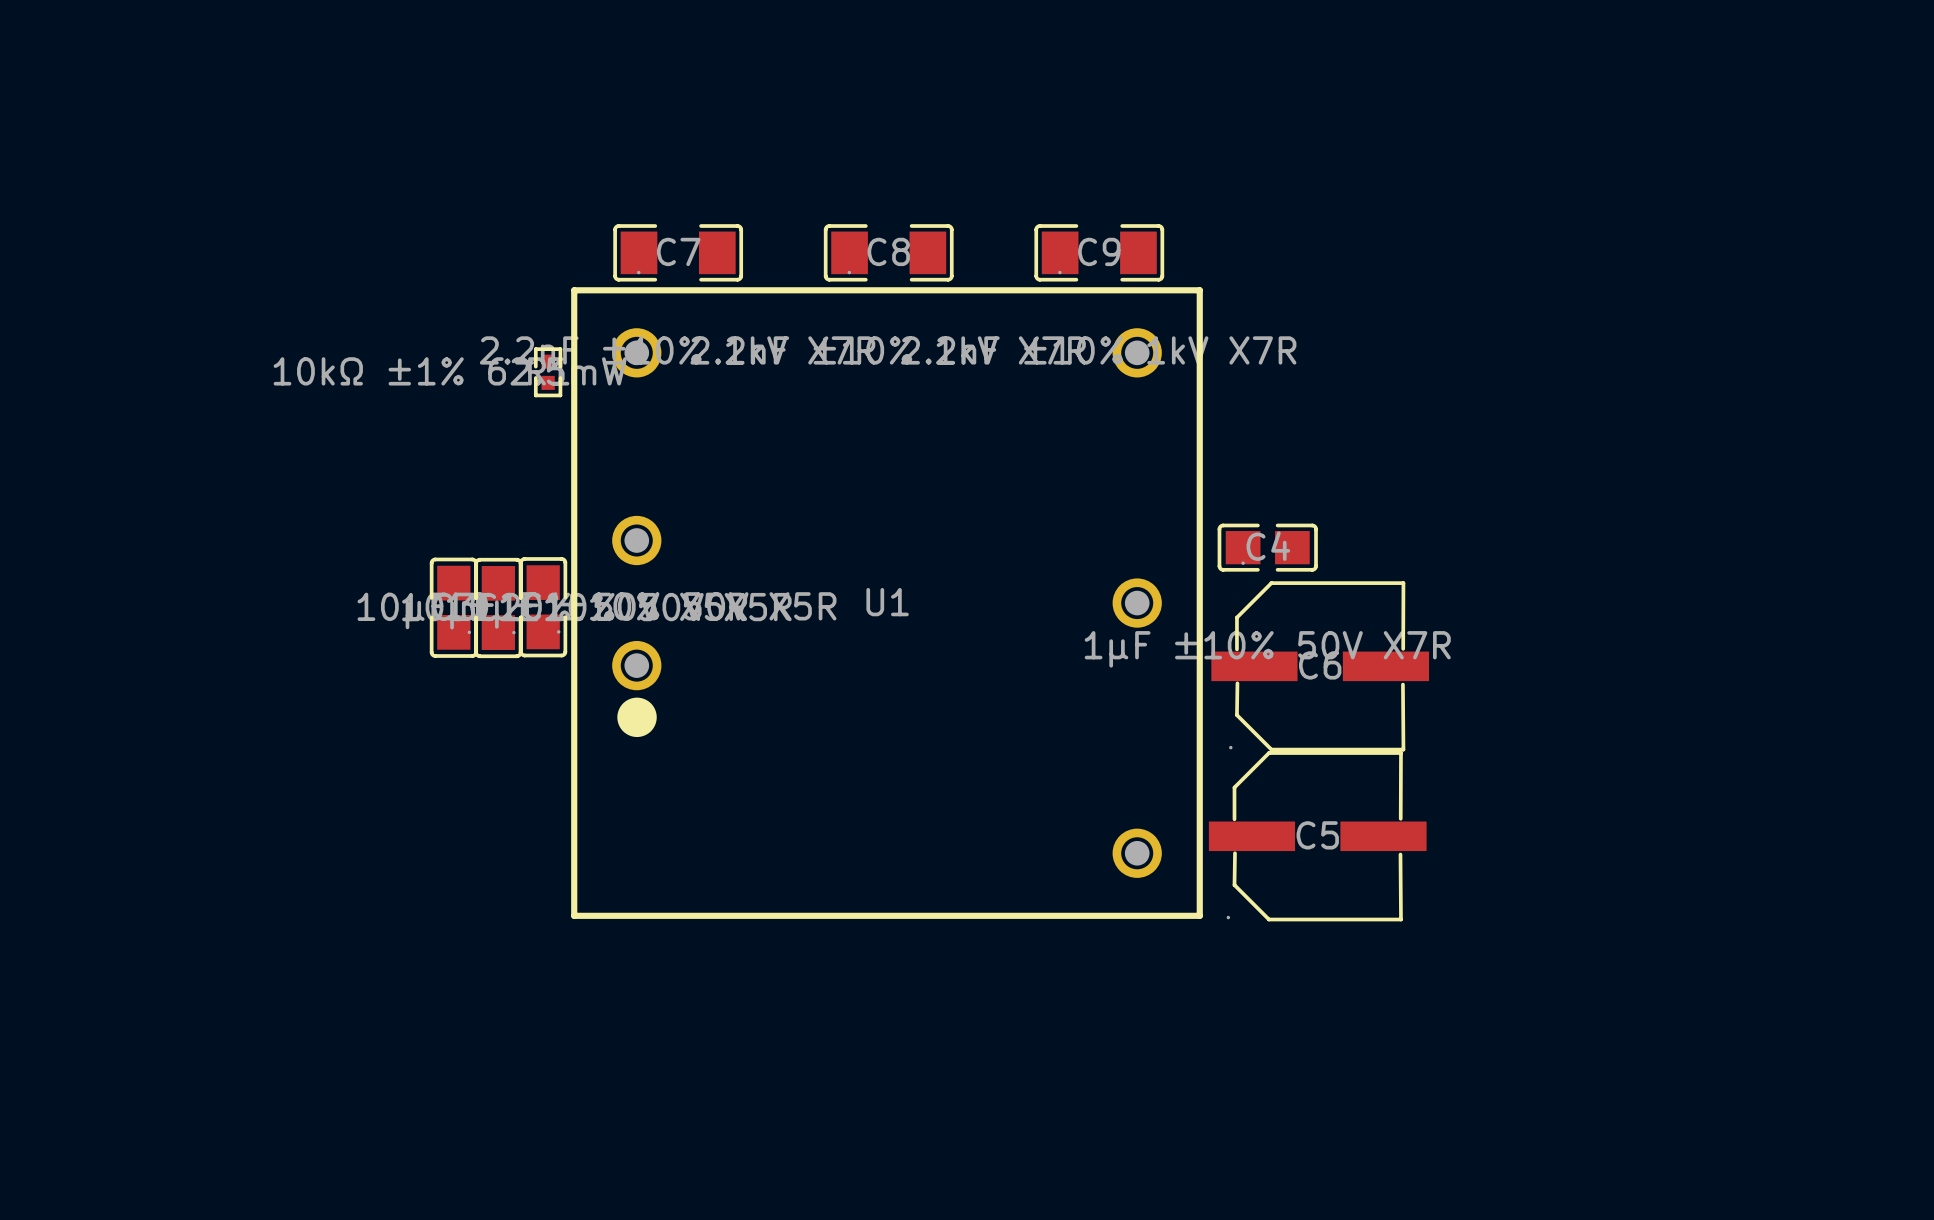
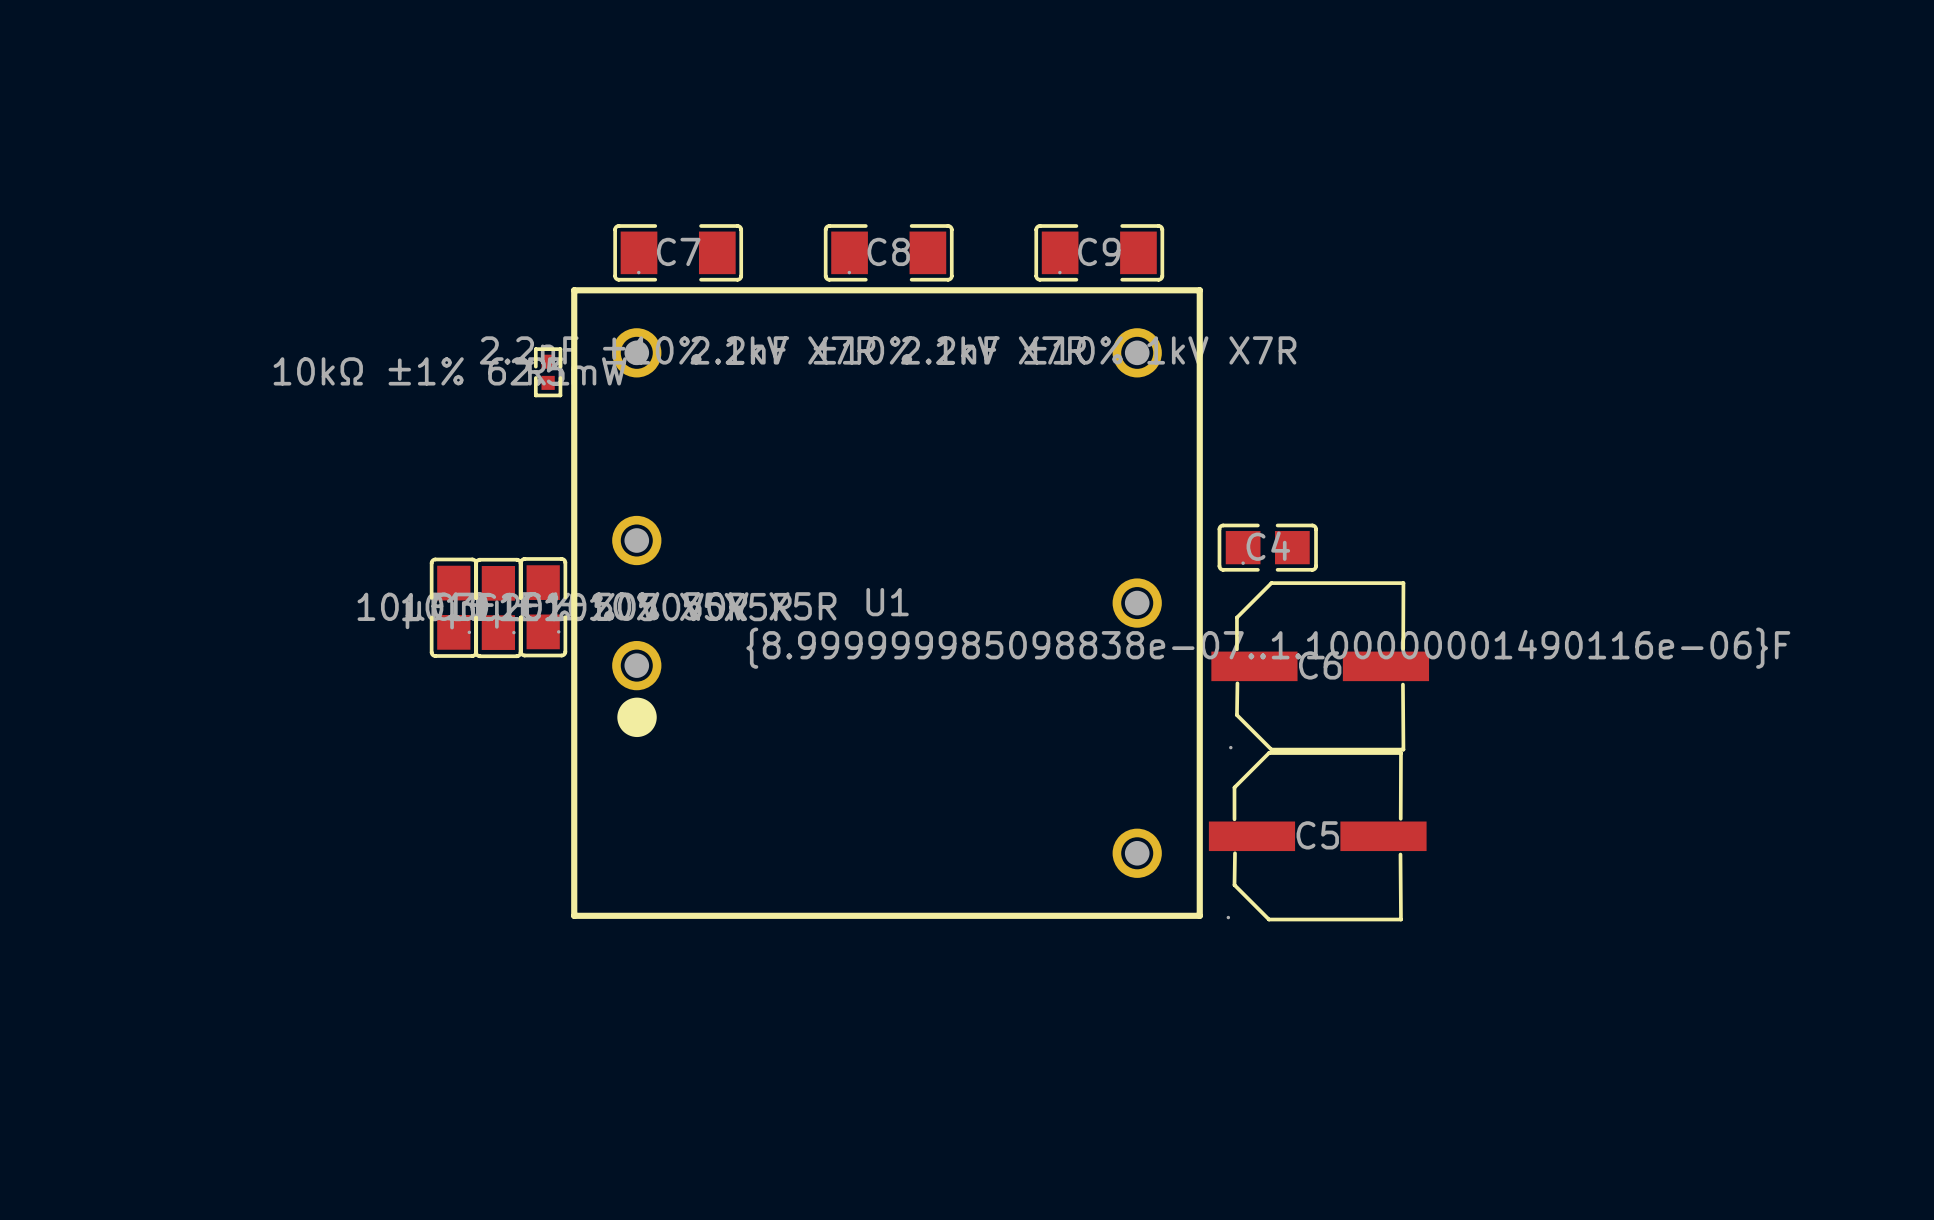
C4 value: 1µF ±10% 50V X7R (1267, 649) -> {8.999999985098838e-07..1.100000001490116e-06}F (1268, 648)

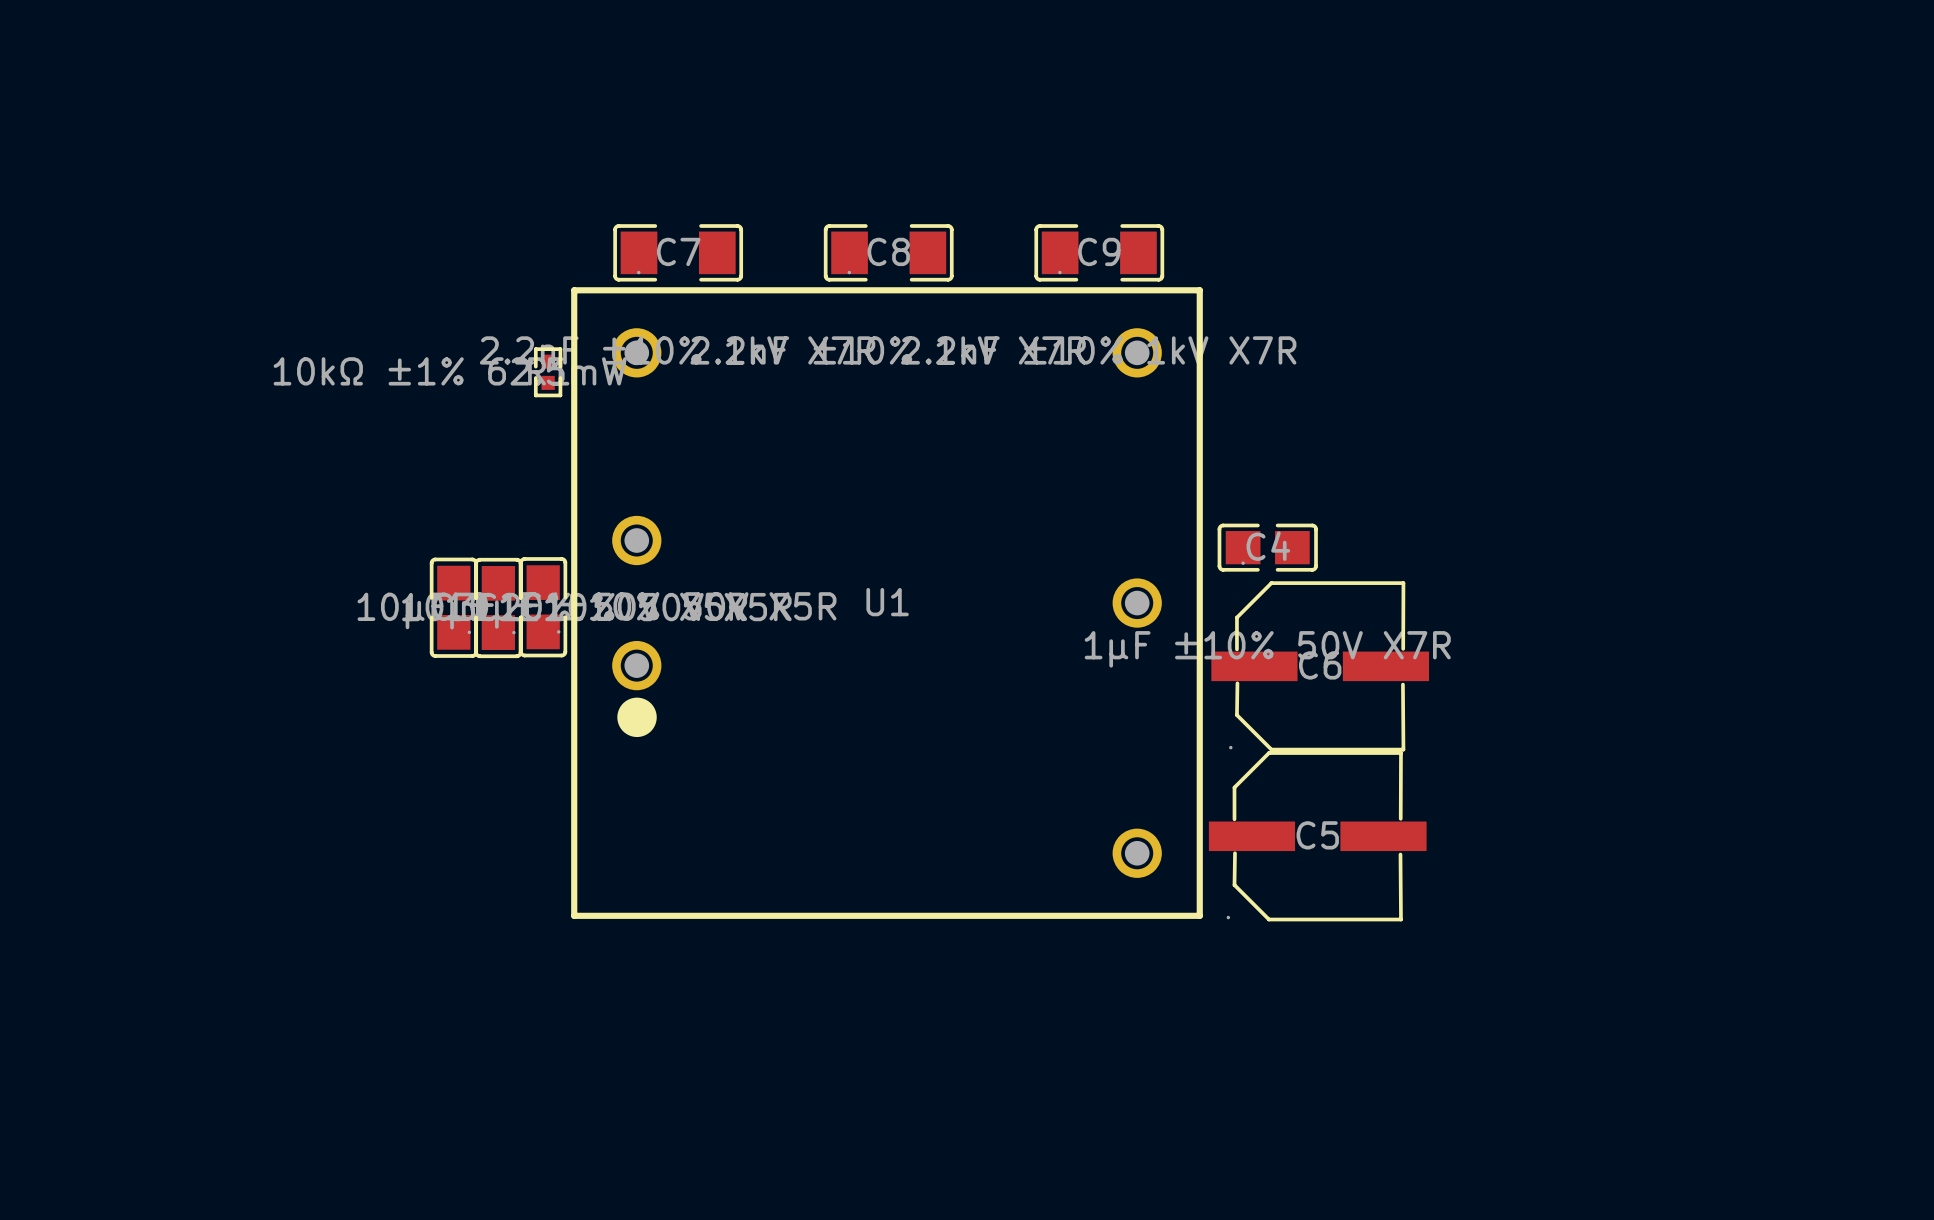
C4 value: {8.999999985098838e-07..1.100000001490116e-06}F (1268, 648) -> 1µF ±10% 50V X7R (1267, 649)

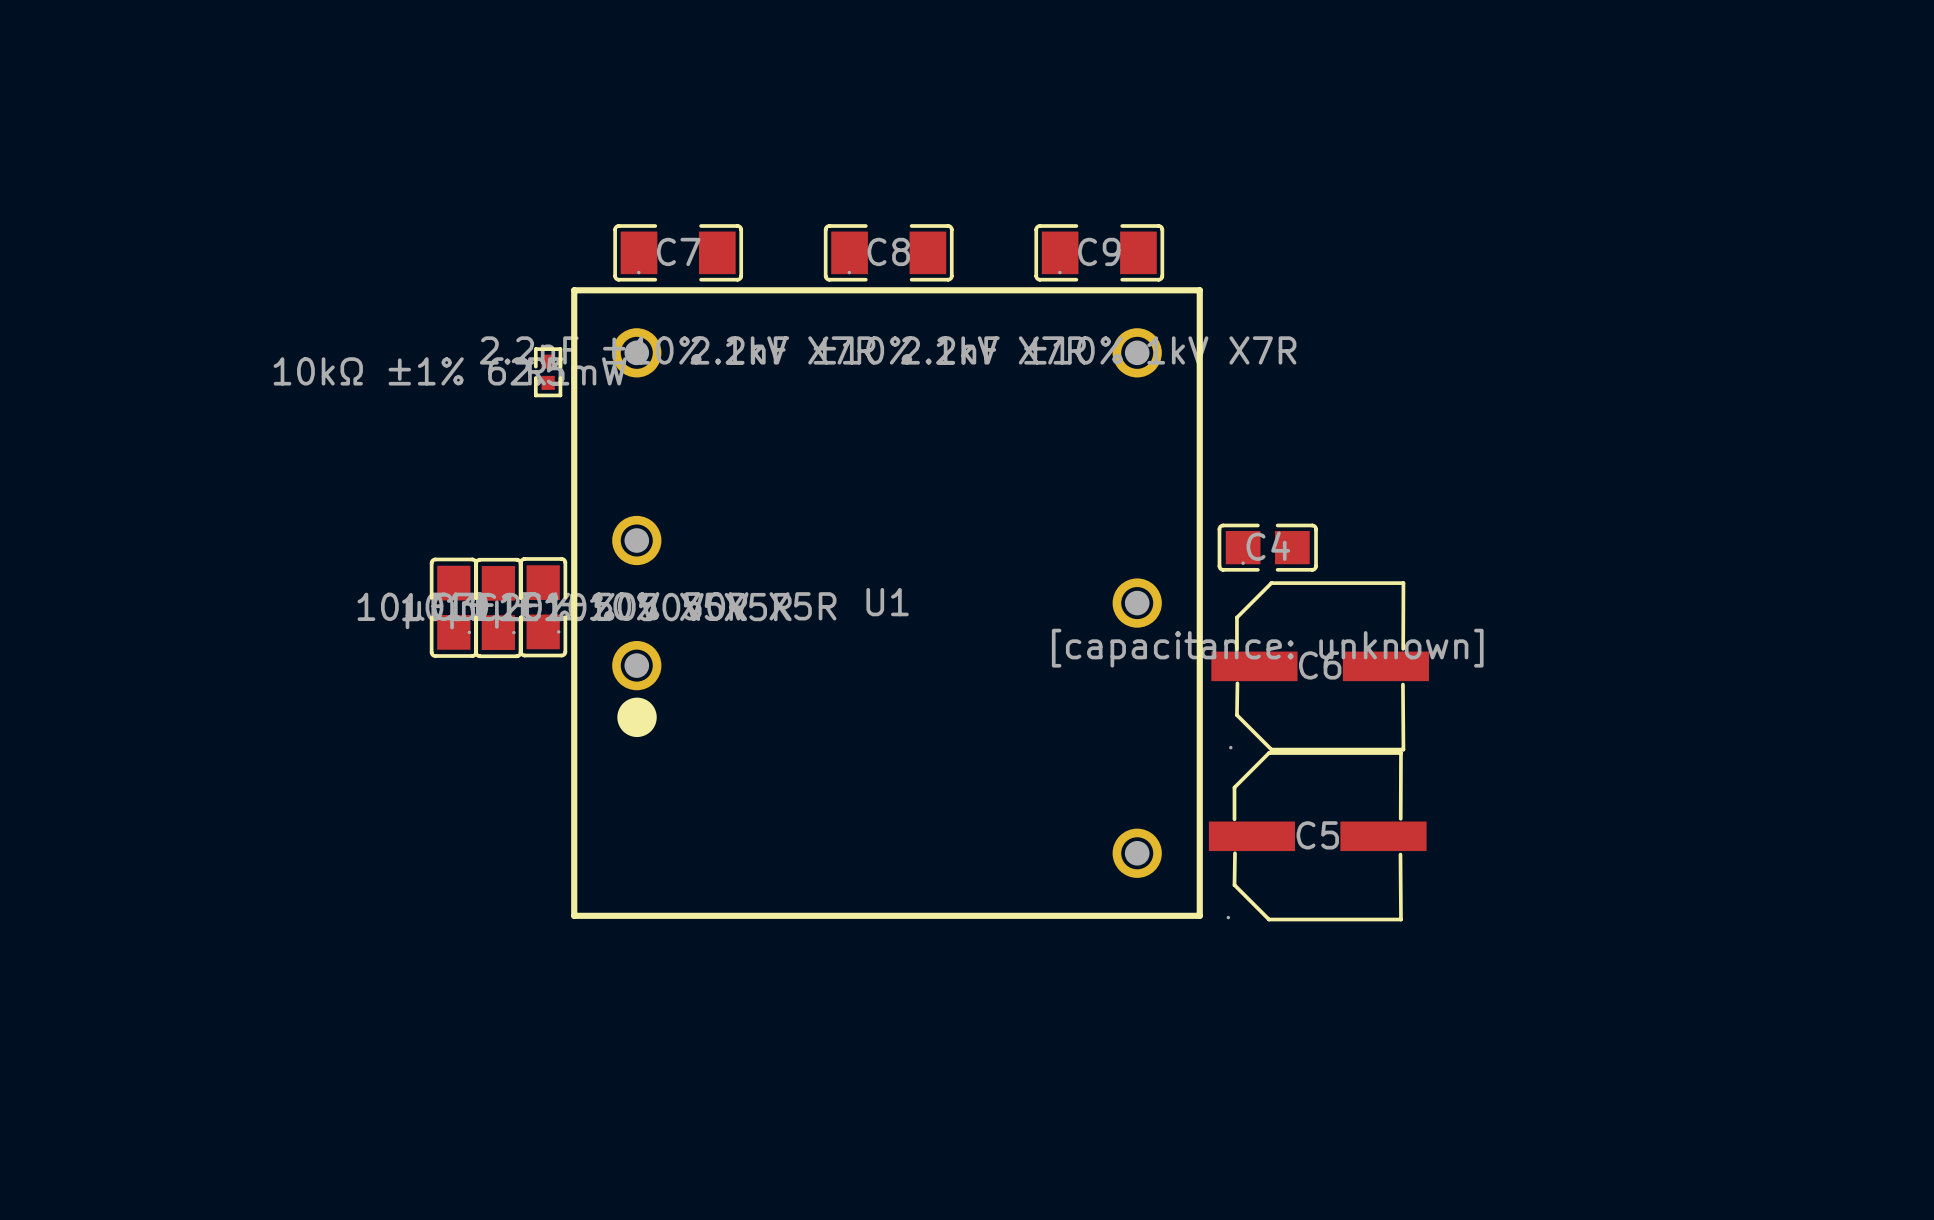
C4 value: 1µF ±10% 50V X7R (1267, 649) -> [capacitance: unknown] (1267, 648)

